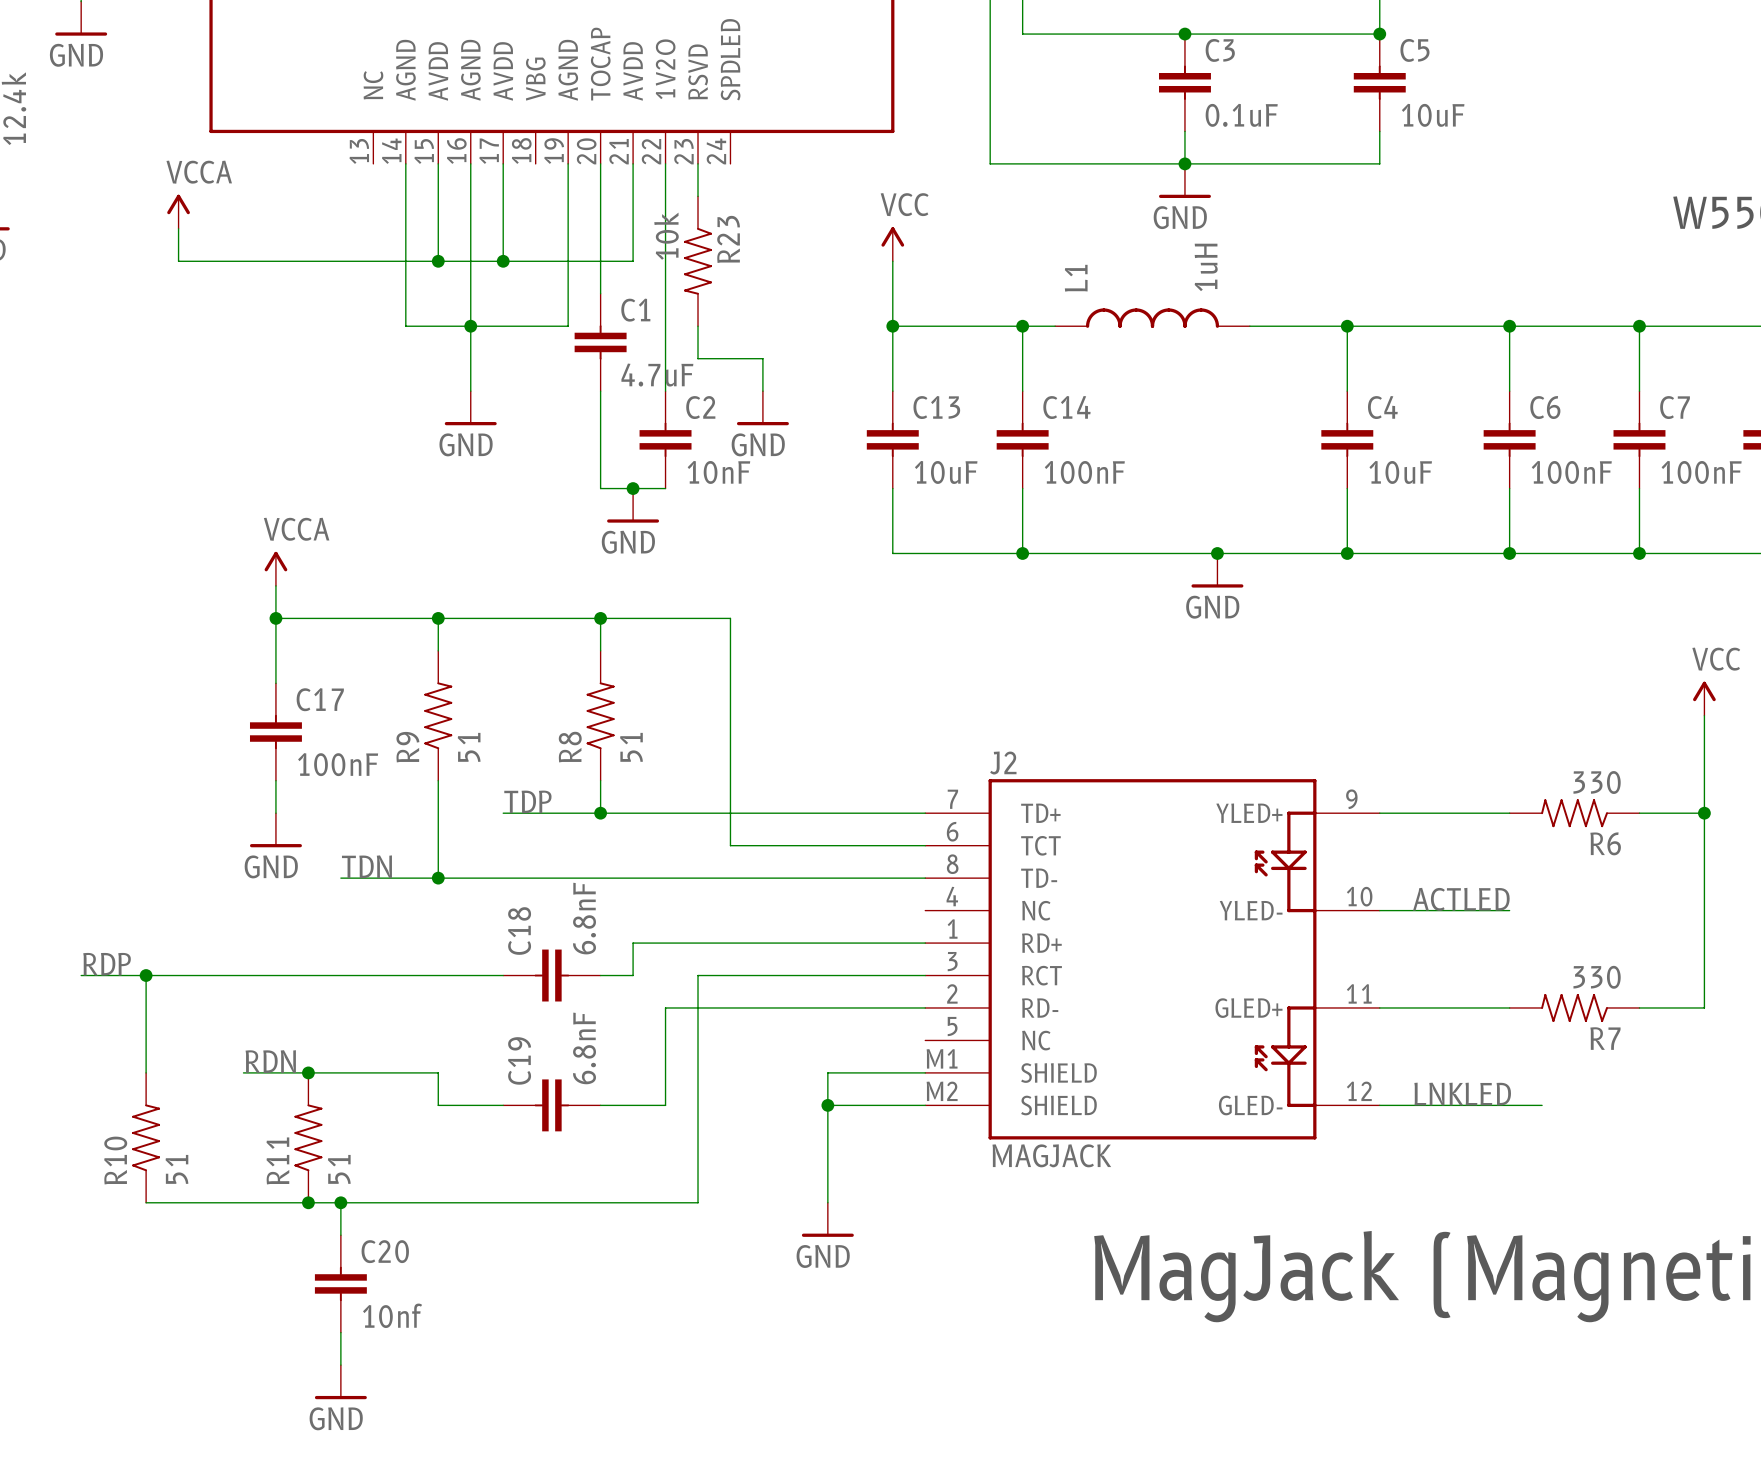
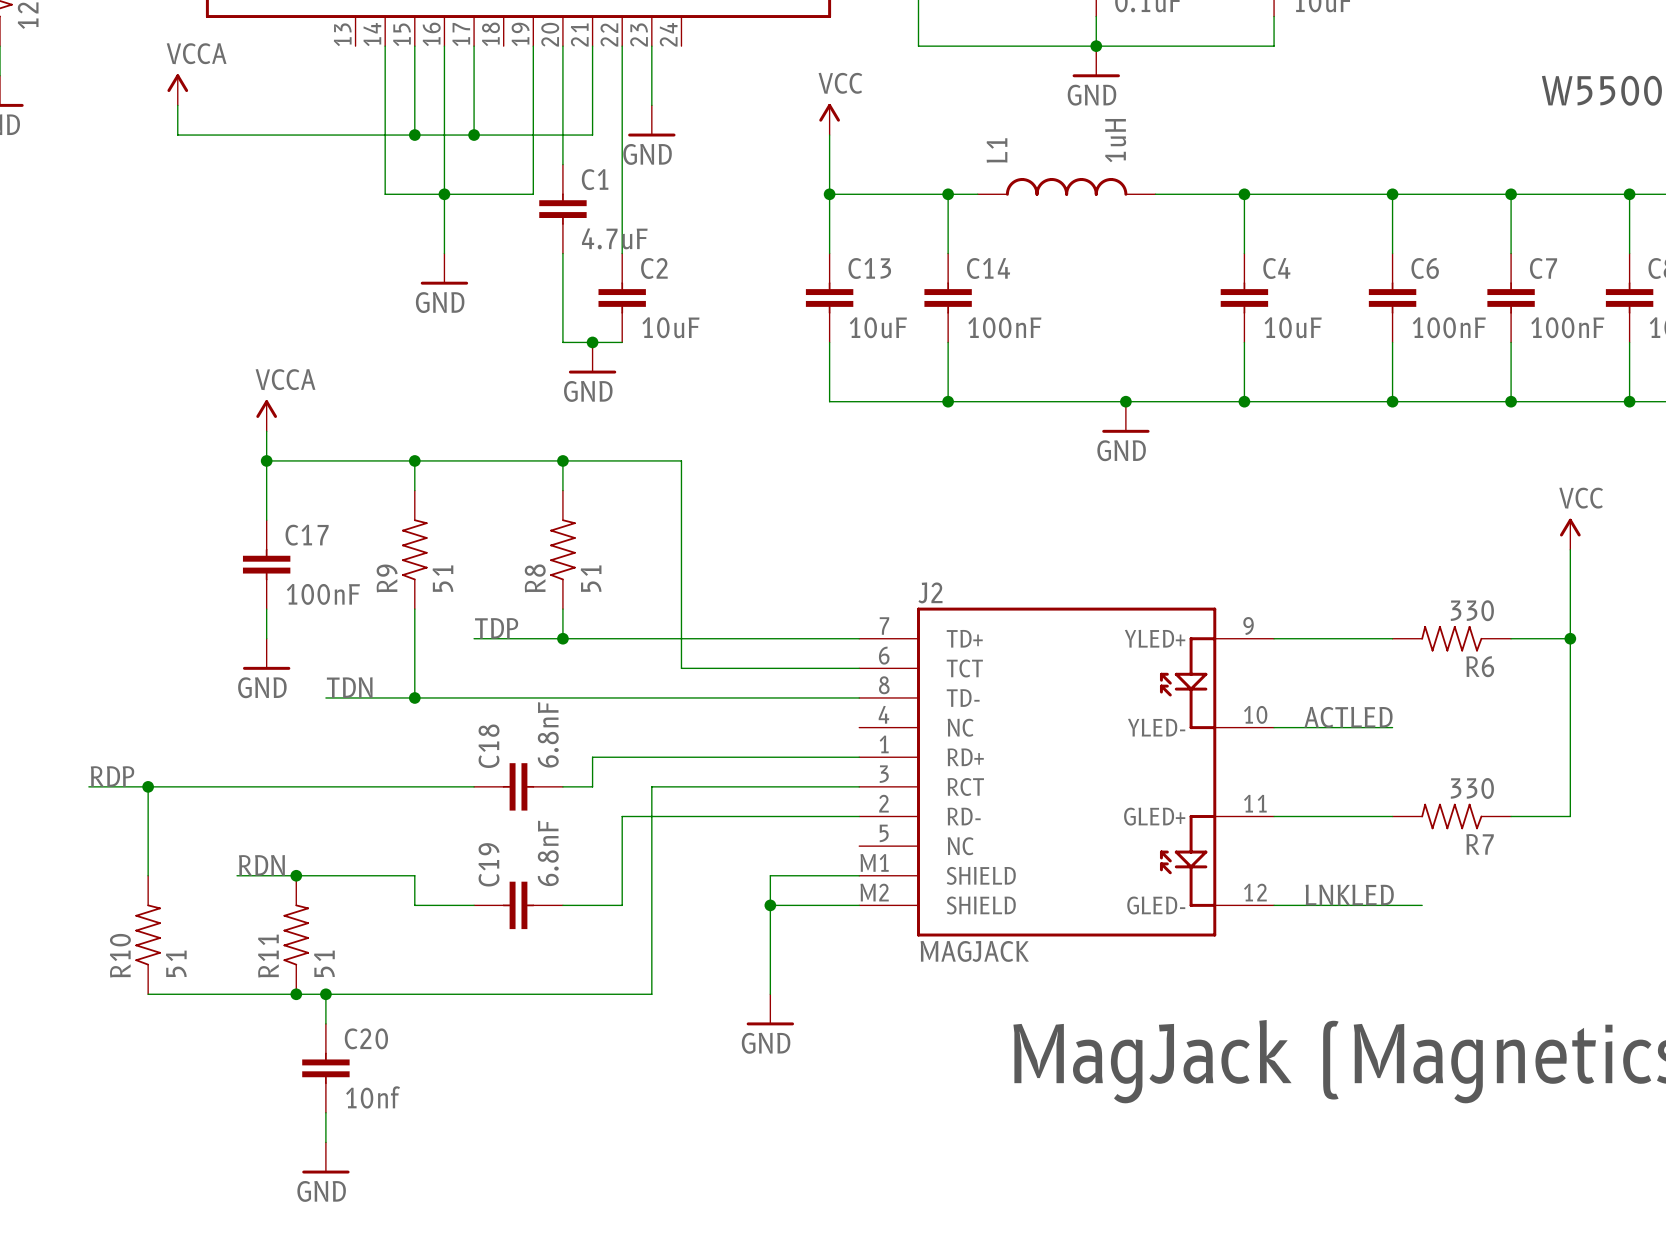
R23: 10k (698, 261) -> none
wire: (698, 326) (698, 358) (762, 358) (762, 391) -> none
power symbol position: GND (762, 408) -> GND (651, 120)
C2 value: 10nF (718, 472) -> 10uF (670, 327)

